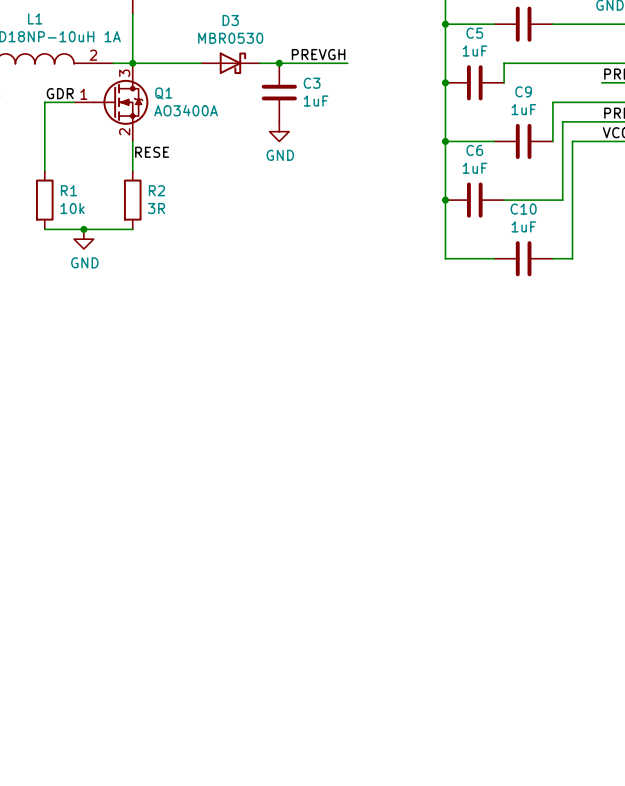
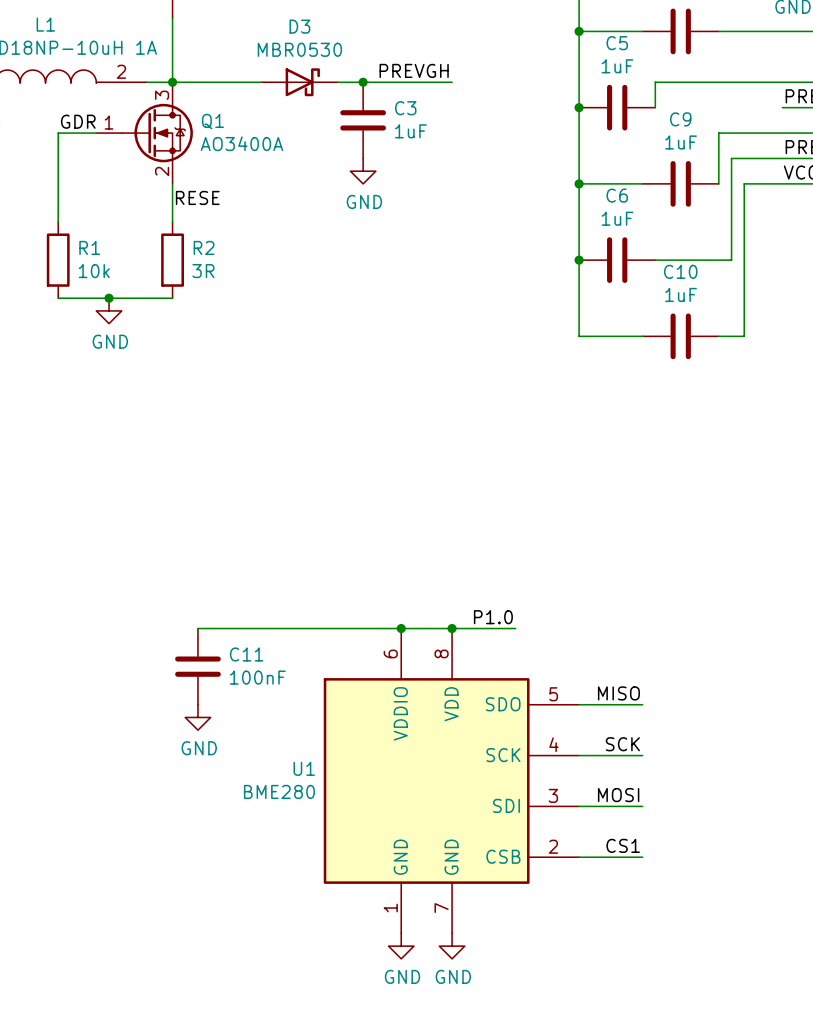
label: none -> P1.0 (493, 617)
wire: none -> (197, 628) (515, 628)
junction: none -> (401, 628)
junction: none -> (452, 628)
C11: none -> 100nF (197, 666)
label: none -> MISO (618, 693)
wire: none -> (579, 704) (642, 704)
power symbol: none -> GND (197, 717)
label: none -> SCK (622, 744)
wire: none -> (579, 755) (642, 755)
U1: none -> BME280 (451, 780)
label: none -> MOSI (618, 795)
wire: none -> (579, 806) (642, 806)
label: none -> CS1 (623, 845)
wire: none -> (579, 857) (642, 857)
power symbol: none -> GND (401, 946)
power symbol: none -> GND (452, 946)

